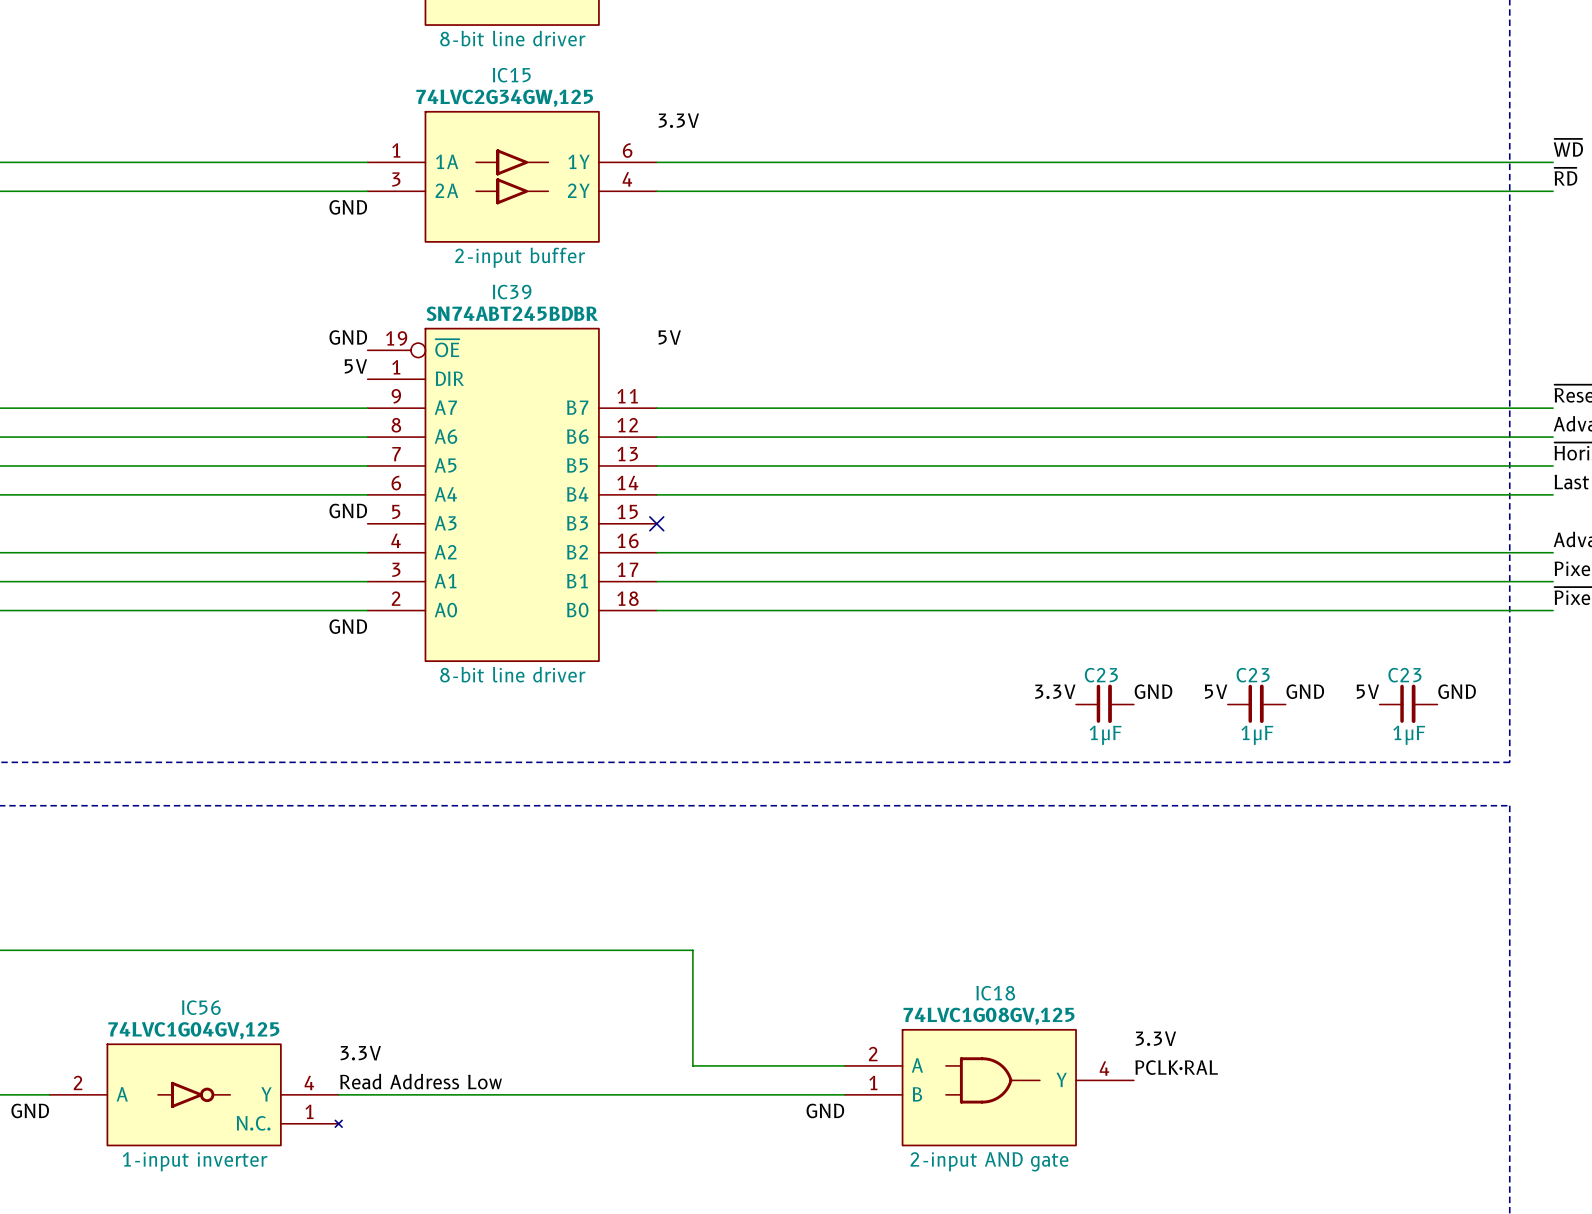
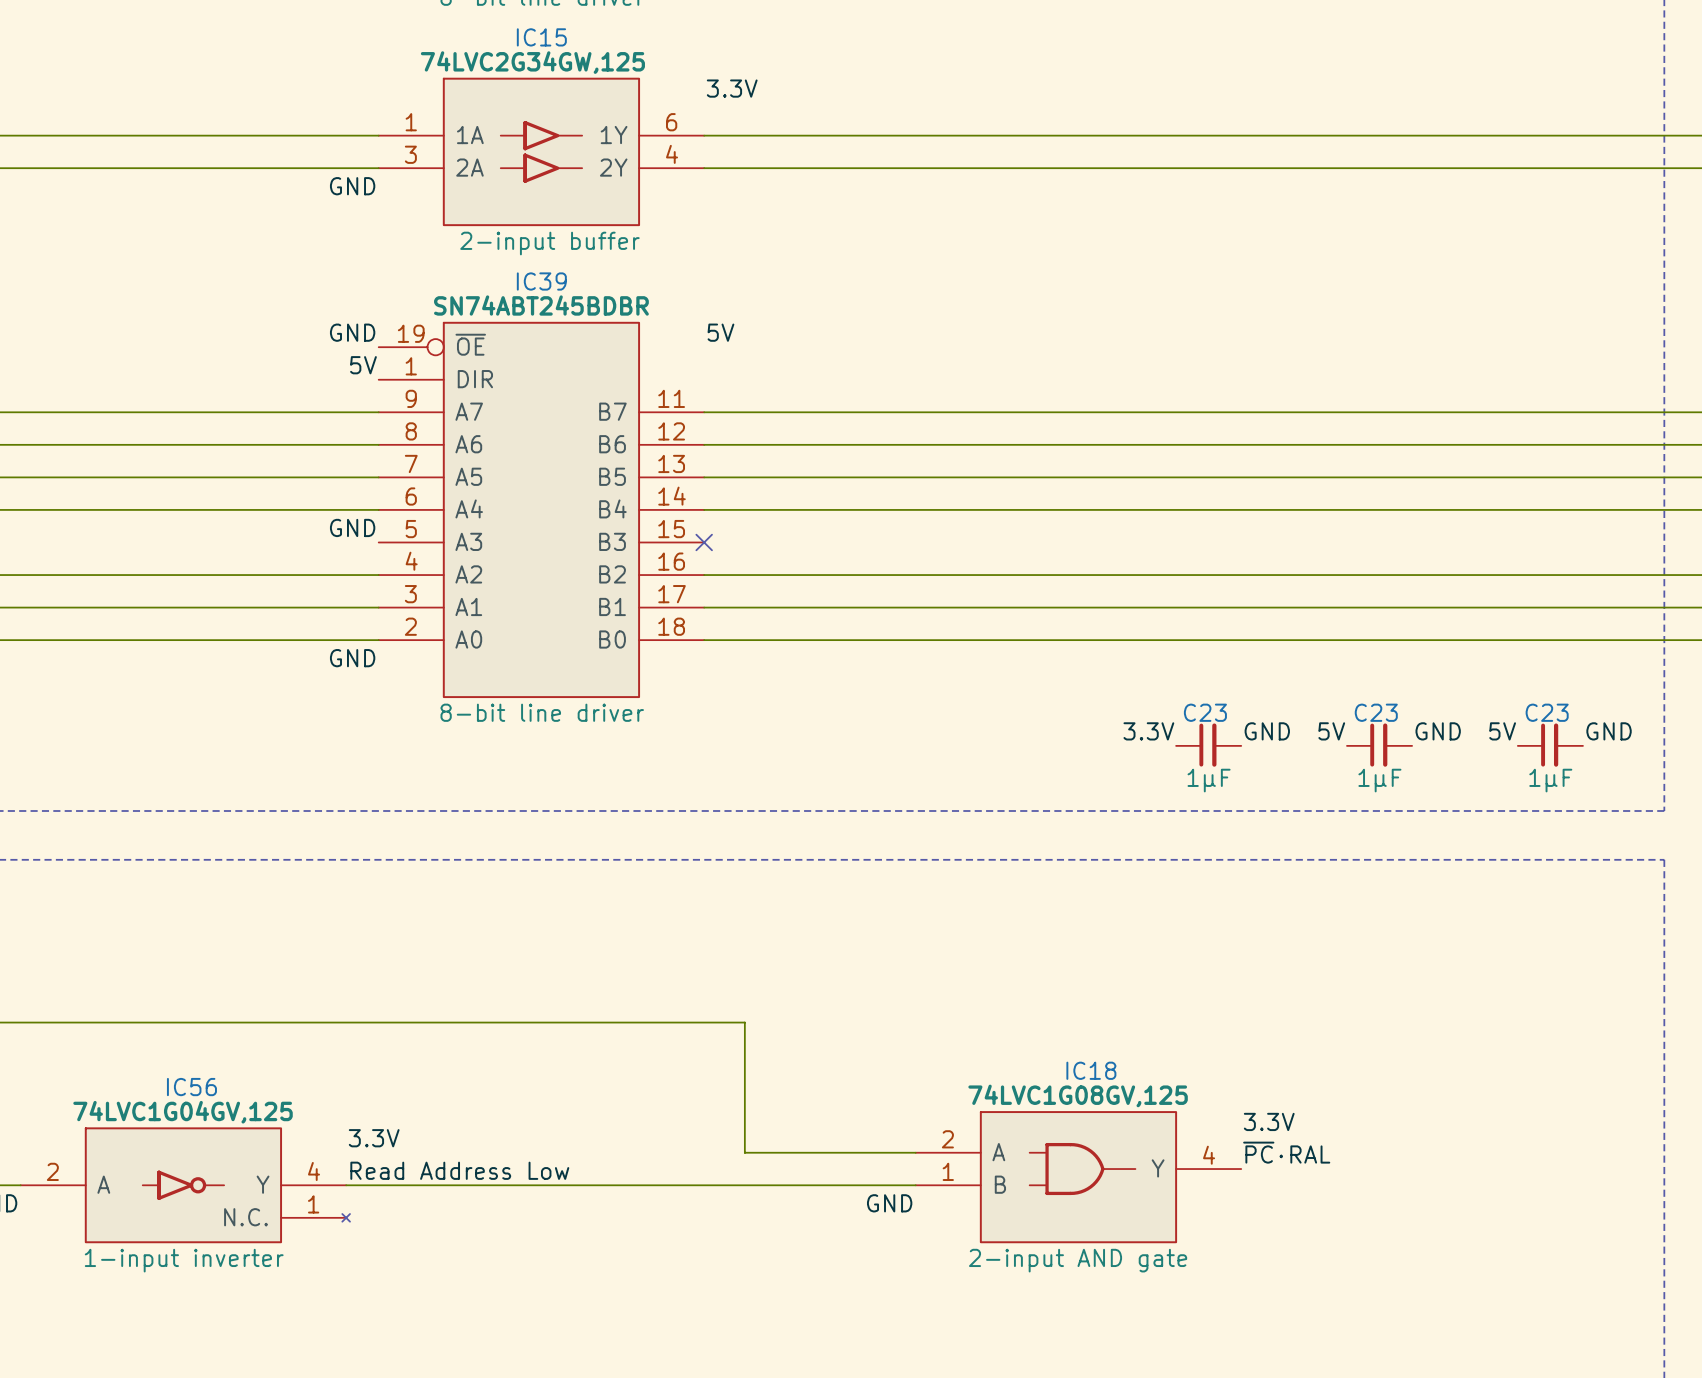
label: PCLK·RAL (1176, 1067) -> ~{PC}·RAL (1286, 1152)

